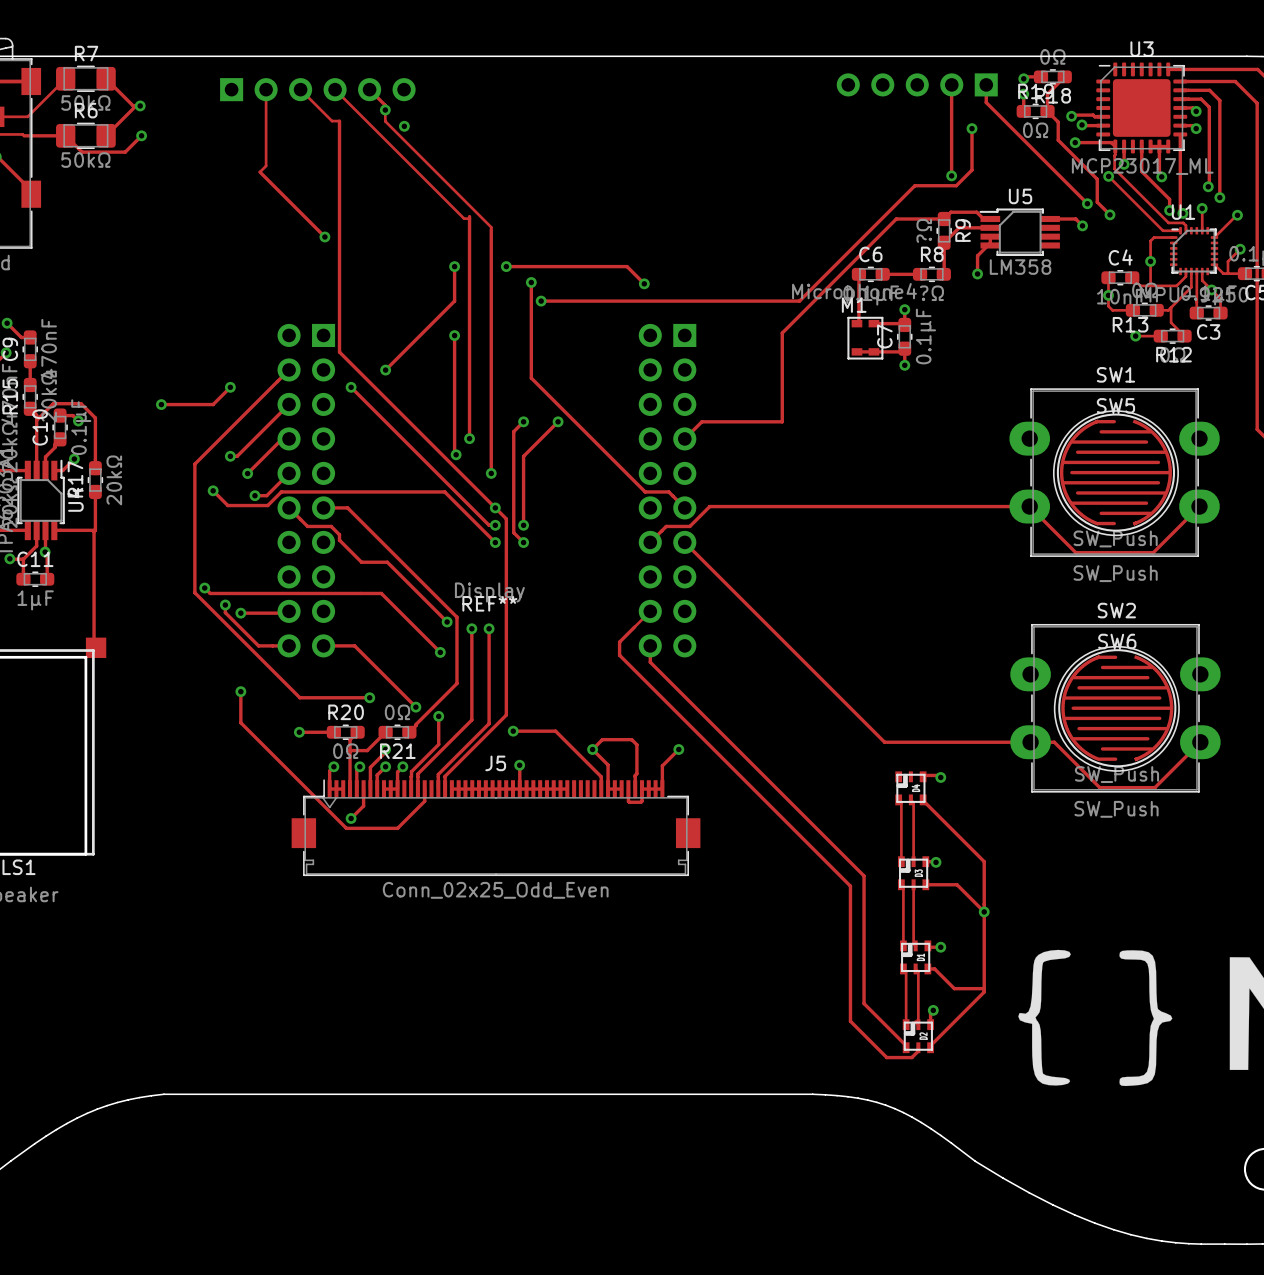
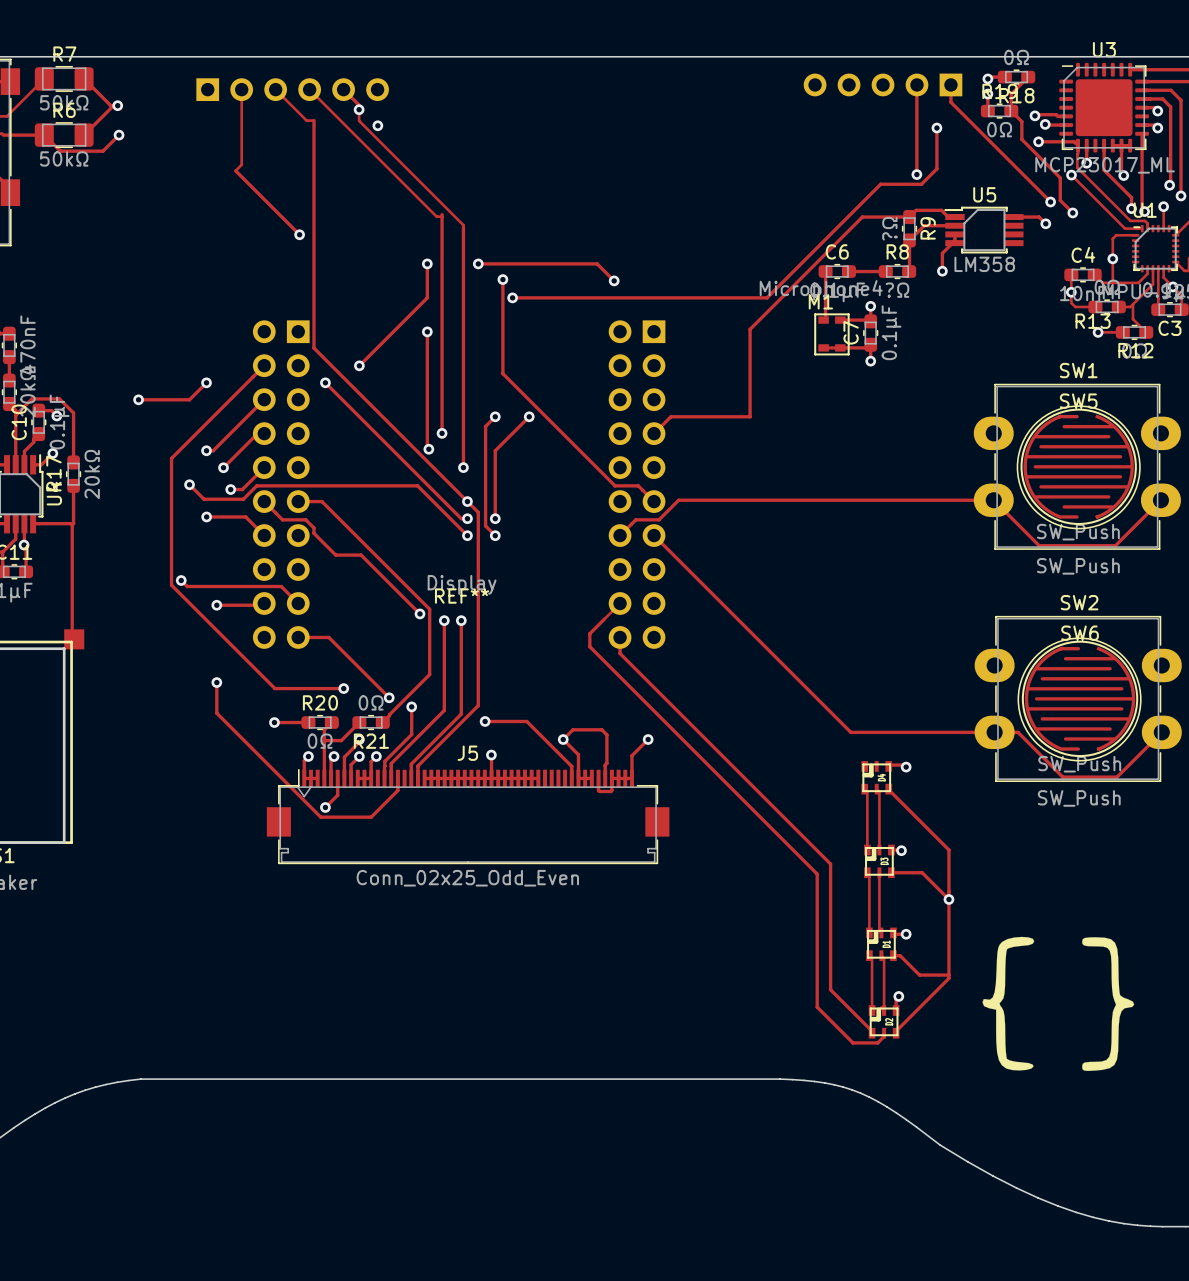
track: none -> (206, 516) (245, 516) (264, 535)
via: none -> (206, 516)
track: (210, 593) (381, 593) (440, 652) -> (186, 585) (281, 586) (298, 603)
track: (225, 605) (225, 612) (258, 645) (289, 645) -> none
via: (225, 605) -> none
via: (440, 652) -> none

